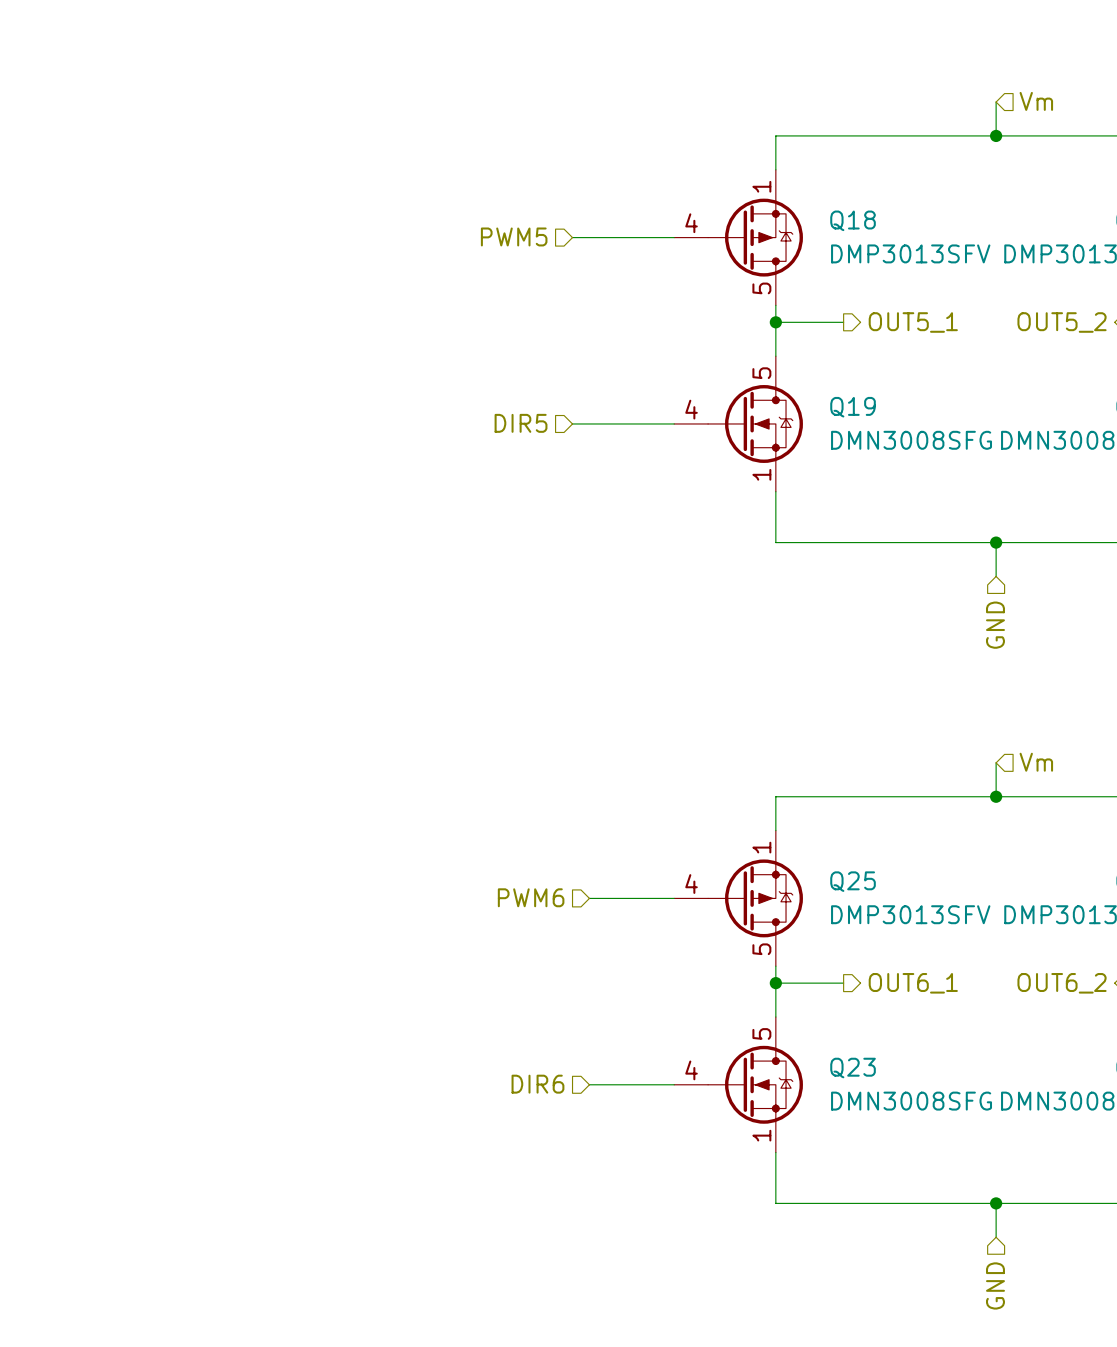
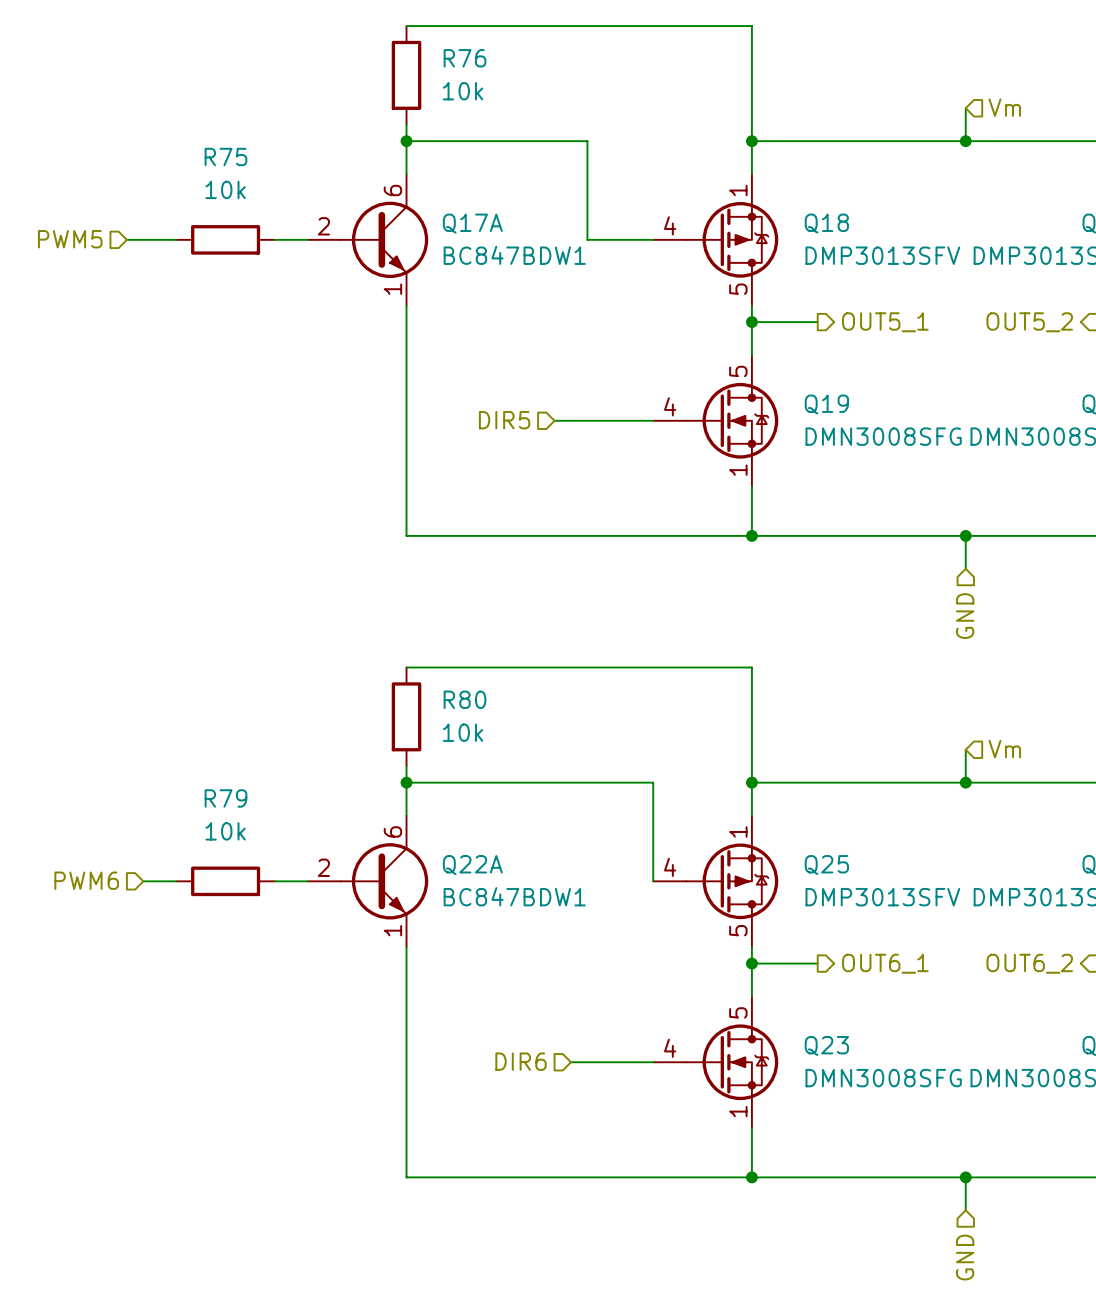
wire: none -> (406, 26) (751, 26) (751, 141)
R76: none -> 10k (406, 75)
wire: none -> (406, 124) (406, 174)
junction: none -> (406, 141)
junction: none -> (751, 141)
hierarchical label: none -> PWM5 (70, 239)
hierarchical label: PWM5 (514, 236) -> none
wire: none -> (126, 239) (176, 239)
R75: none -> 10k (225, 239)
wire: none -> (274, 239) (307, 239)
Q17A: none -> BC847BDW1 (368, 239)
wire: (572, 237) (606, 237) -> (406, 141) (587, 141) (587, 239)
wire: none -> (406, 305) (406, 535) (751, 535)
junction: none -> (751, 535)
wire: none -> (406, 667) (751, 667) (751, 782)
R80: none -> 10k (406, 716)
wire: none -> (406, 766) (406, 815)
junction: none -> (406, 782)
junction: none -> (751, 782)
hierarchical label: none -> PWM6 (86, 880)
hierarchical label: PWM6 (531, 897) -> none
wire: none -> (143, 881) (176, 881)
R79: none -> 10k (225, 881)
wire: none -> (274, 881) (307, 881)
Q22A: none -> BC847BDW1 (368, 881)
wire: (589, 898) (674, 898) -> (406, 782) (653, 782) (653, 881)
wire: none -> (406, 947) (406, 1177) (751, 1177)
junction: none -> (751, 1177)

